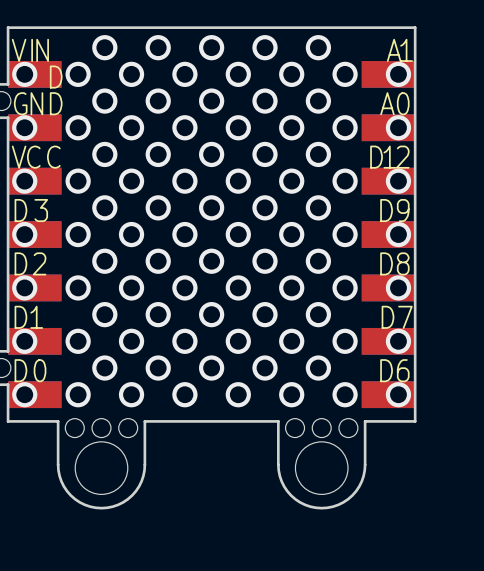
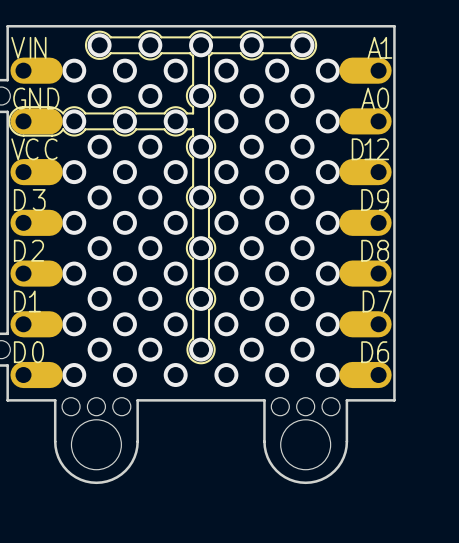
line: none -> (137, 53) (110, 53) (103, 58) (97, 58) (87, 51) (86, 41) (89, 35) (97, 31) (103, 32) (110, 37) (139, 37) (143, 32) (150, 31) (156, 32) (161, 37) (189, 37) (194, 32) (201, 31) (207, 32) (212, 37) (240, 37) (245, 32) (251, 31) (258, 32) (262, 37) (291, 37) (296, 32) (303, 31) (311, 34) (315, 41) (314, 51) (305, 58) (298, 58) (291, 53) (262, 53) (258, 57) (251, 59) (245, 57) (240, 53) (212, 53) (208, 56) (208, 84) (213, 89) (215, 96) (213, 102) (208, 107) (208, 135) (213, 140) (215, 146) (213, 153) (208, 157) (208, 186) (213, 191) (215, 197) (213, 203) (208, 208) (208, 237) (213, 241) (215, 248) (213, 254) (208, 259) (208, 287) (213, 292) (215, 298) (213, 305) (208, 310) (208, 338) (213, 343) (214, 350) (211, 358) (204, 362) (193, 360) (187, 350) (188, 343) (193, 338) (193, 310) (188, 305) (186, 298) (188, 292) (193, 287) (193, 259) (188, 254) (186, 248) (188, 241) (193, 237) (193, 208) (188, 203) (186, 197) (188, 191) (193, 186) (193, 157) (188, 153) (186, 146) (188, 140) (193, 135) (193, 129) (186, 129) (182, 133) (175, 135) (169, 133) (164, 129) (136, 129) (131, 133) (124, 135) (118, 133) (113, 129) (85, 129) (80, 133) (72, 135) (63, 129) (53, 135) (23, 135) (14, 132) (9, 125) (12, 112) (23, 107) (52, 107) (63, 113) (67, 108) (74, 107) (80, 108) (85, 113) (113, 113) (118, 108) (124, 107) (131, 108) (136, 113) (164, 113) (169, 108) (175, 107) (182, 108) (186, 113) (193, 113) (193, 107) (188, 102) (186, 96) (188, 89) (193, 84) (193, 56) (189, 53) (161, 53) (156, 57) (150, 59) (143, 57) (139, 53)
via: (24, 74) -> none
part: (34, 74) -> none
part: none -> (36, 70)
part: none -> (365, 70)
part: (388, 74) -> none
via: (398, 74) -> none
text: D (56, 77) -> none
via: (24, 127) -> none
part: (34, 127) -> none
part: none -> (36, 121)
part: none -> (365, 121)
part: (388, 127) -> none
via: (398, 127) -> none
via: (24, 181) -> none
part: (34, 181) -> none
part: none -> (36, 172)
part: none -> (365, 172)
part: (388, 181) -> none
via: (398, 181) -> none
via: (24, 234) -> none
part: (34, 234) -> none
part: none -> (36, 222)
part: none -> (365, 222)
part: (388, 234) -> none
via: (398, 234) -> none
via: (24, 287) -> none
part: (34, 287) -> none
part: none -> (36, 273)
part: none -> (365, 273)
part: (388, 287) -> none
via: (398, 287) -> none
via: (24, 341) -> none
part: (34, 341) -> none
part: none -> (36, 324)
part: none -> (365, 324)
part: (388, 341) -> none
via: (398, 341) -> none
via: (24, 394) -> none
part: (34, 394) -> none
part: none -> (36, 375)
part: none -> (365, 375)
part: (388, 394) -> none
via: (398, 394) -> none

